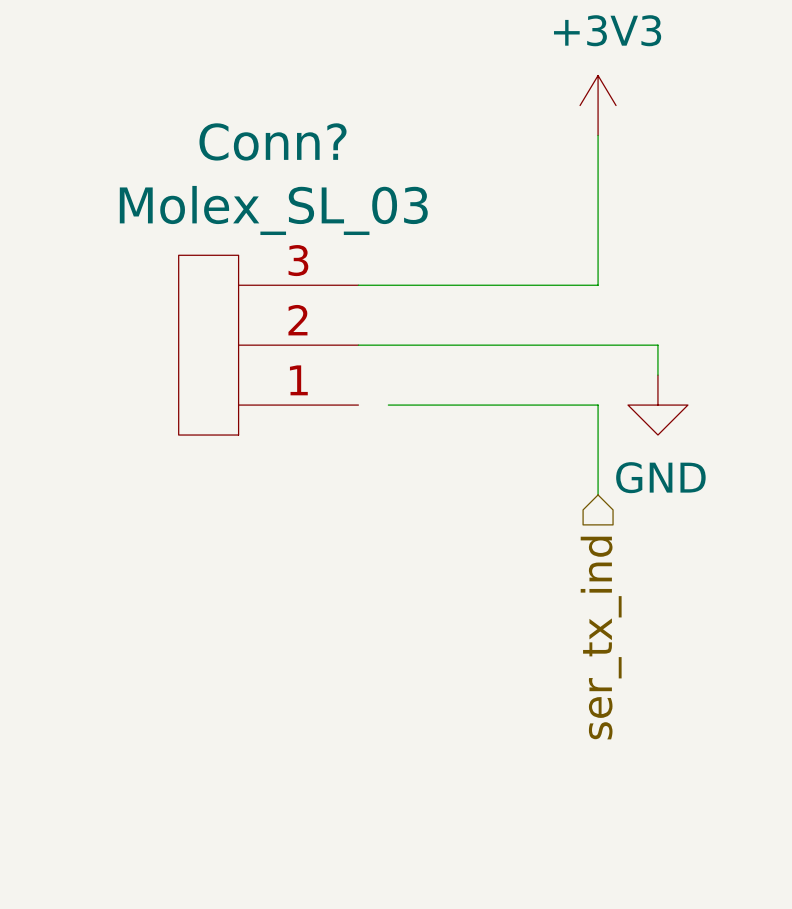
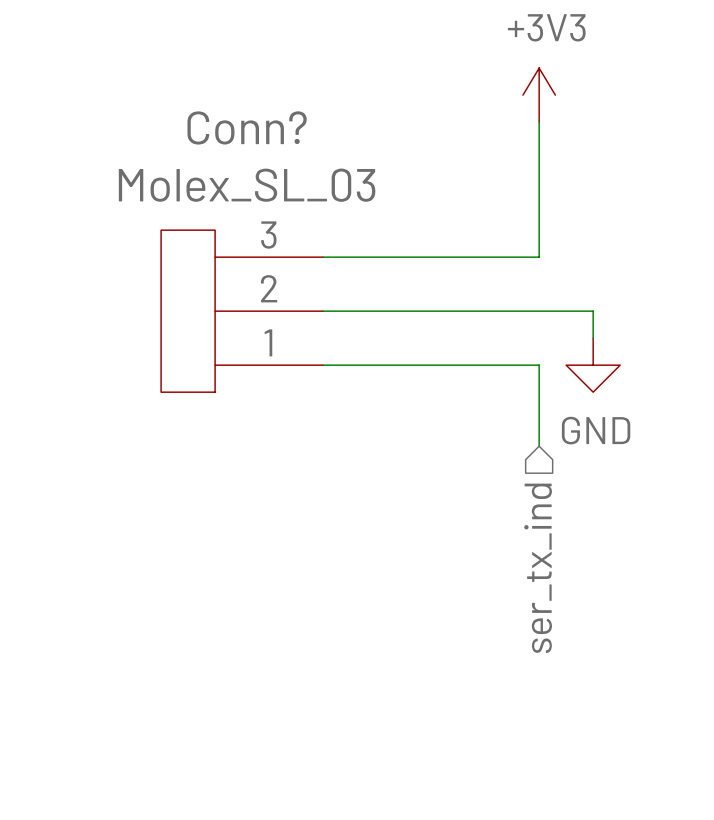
wire: none -> (323, 365) (350, 365)

